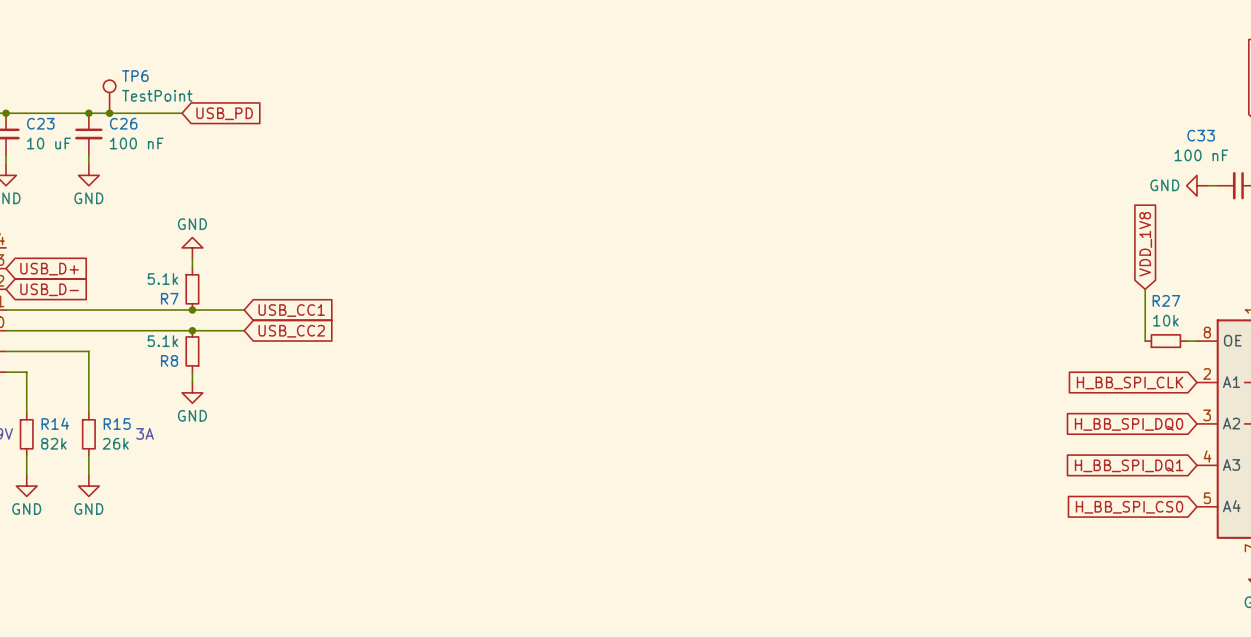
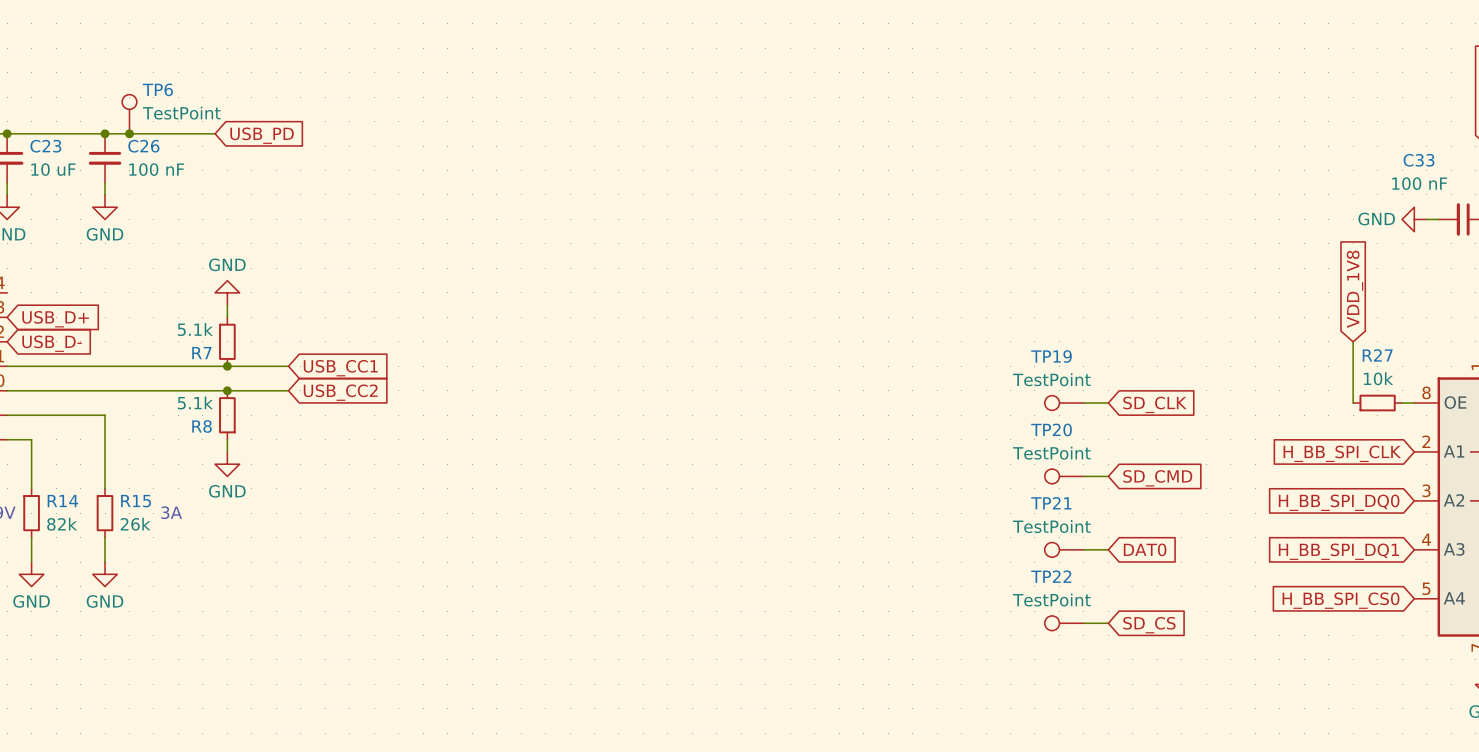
TP19: none -> TestPoint (1064, 403)
wire: none -> (1083, 403) (1108, 403)
global label: none -> SD_CLK (1154, 404)
TP20: none -> TestPoint (1064, 476)
wire: none -> (1083, 476) (1108, 476)
global label: none -> SD_CMD (1157, 478)
TP21: none -> TestPoint (1064, 549)
wire: none -> (1083, 549) (1108, 549)
global label: none -> DAT0 (1145, 549)
TP22: none -> TestPoint (1064, 623)
wire: none -> (1083, 623) (1108, 623)
global label: none -> SD_CS (1149, 625)

